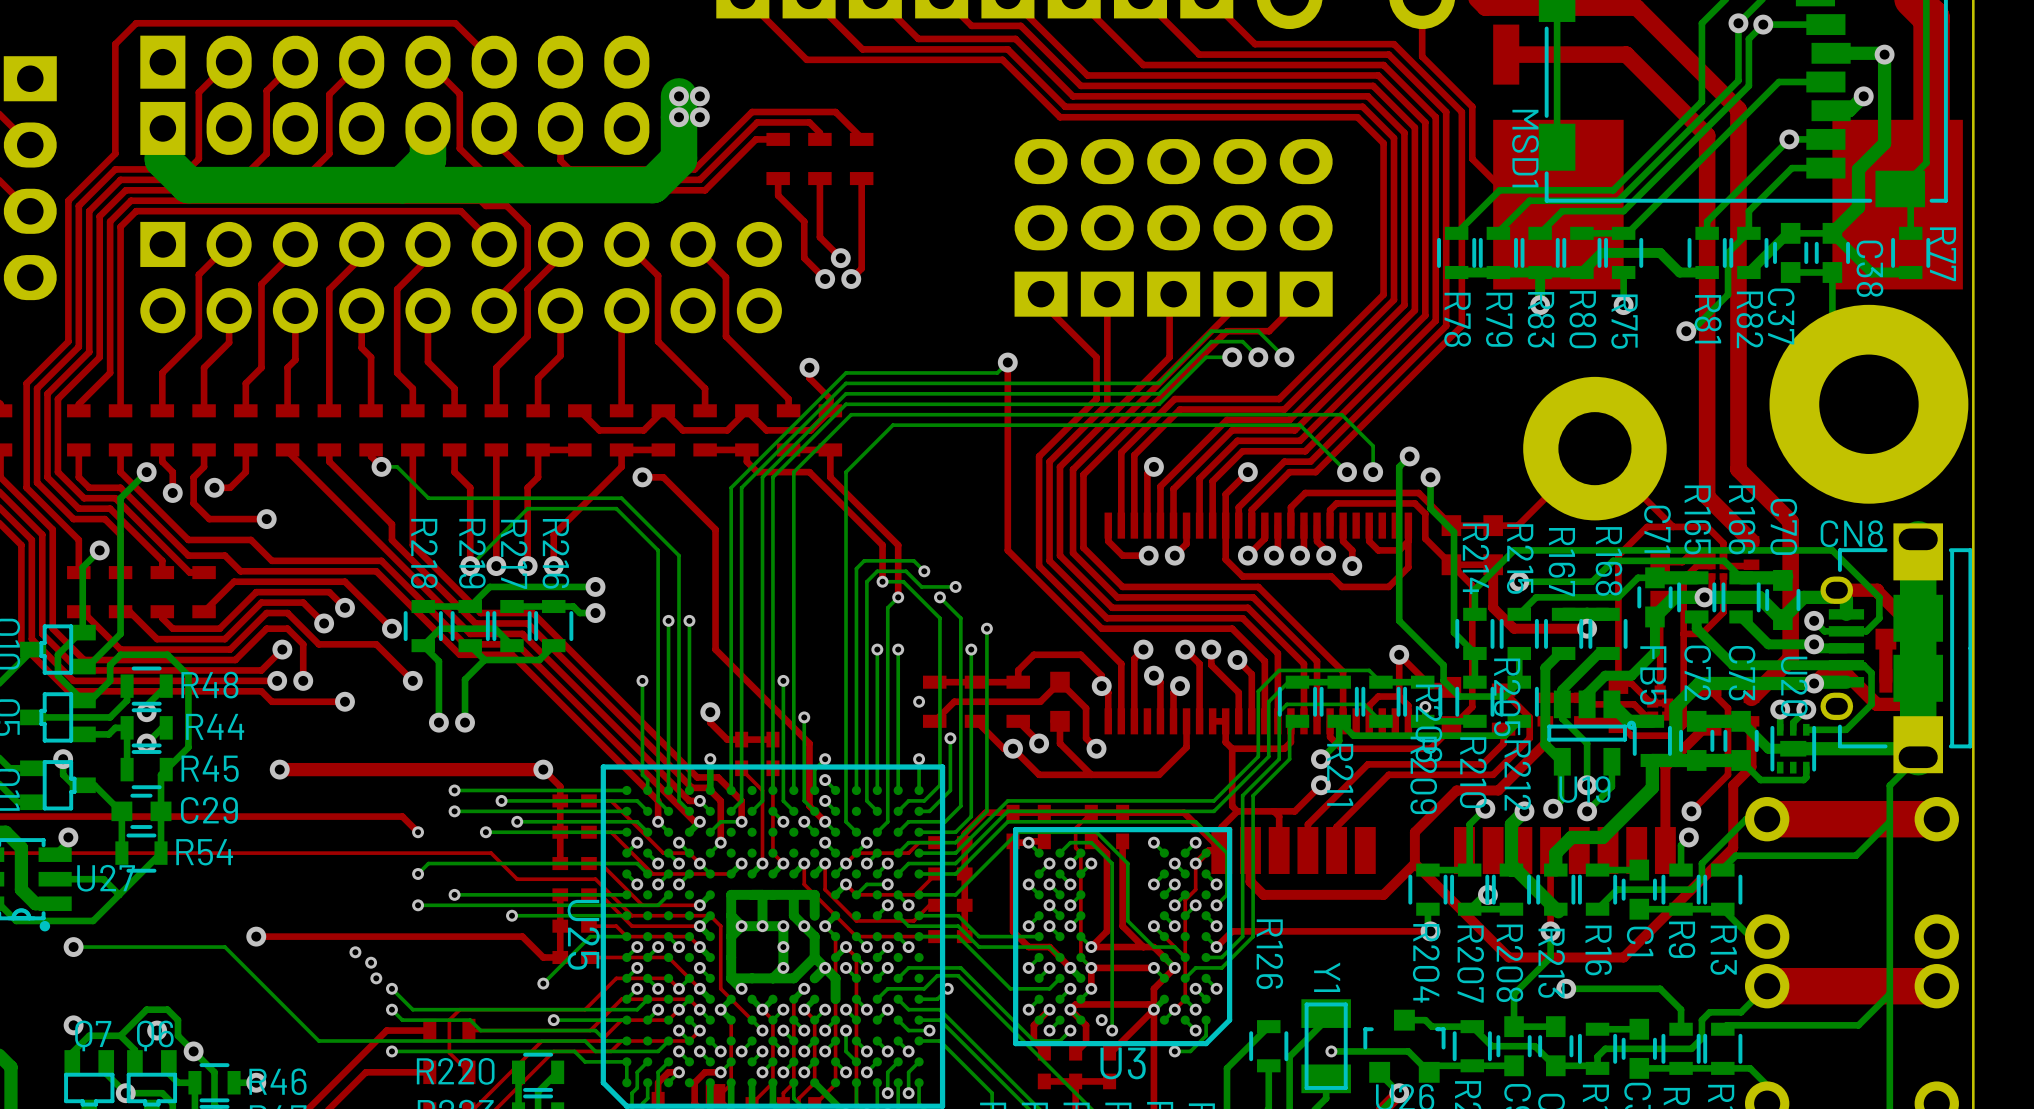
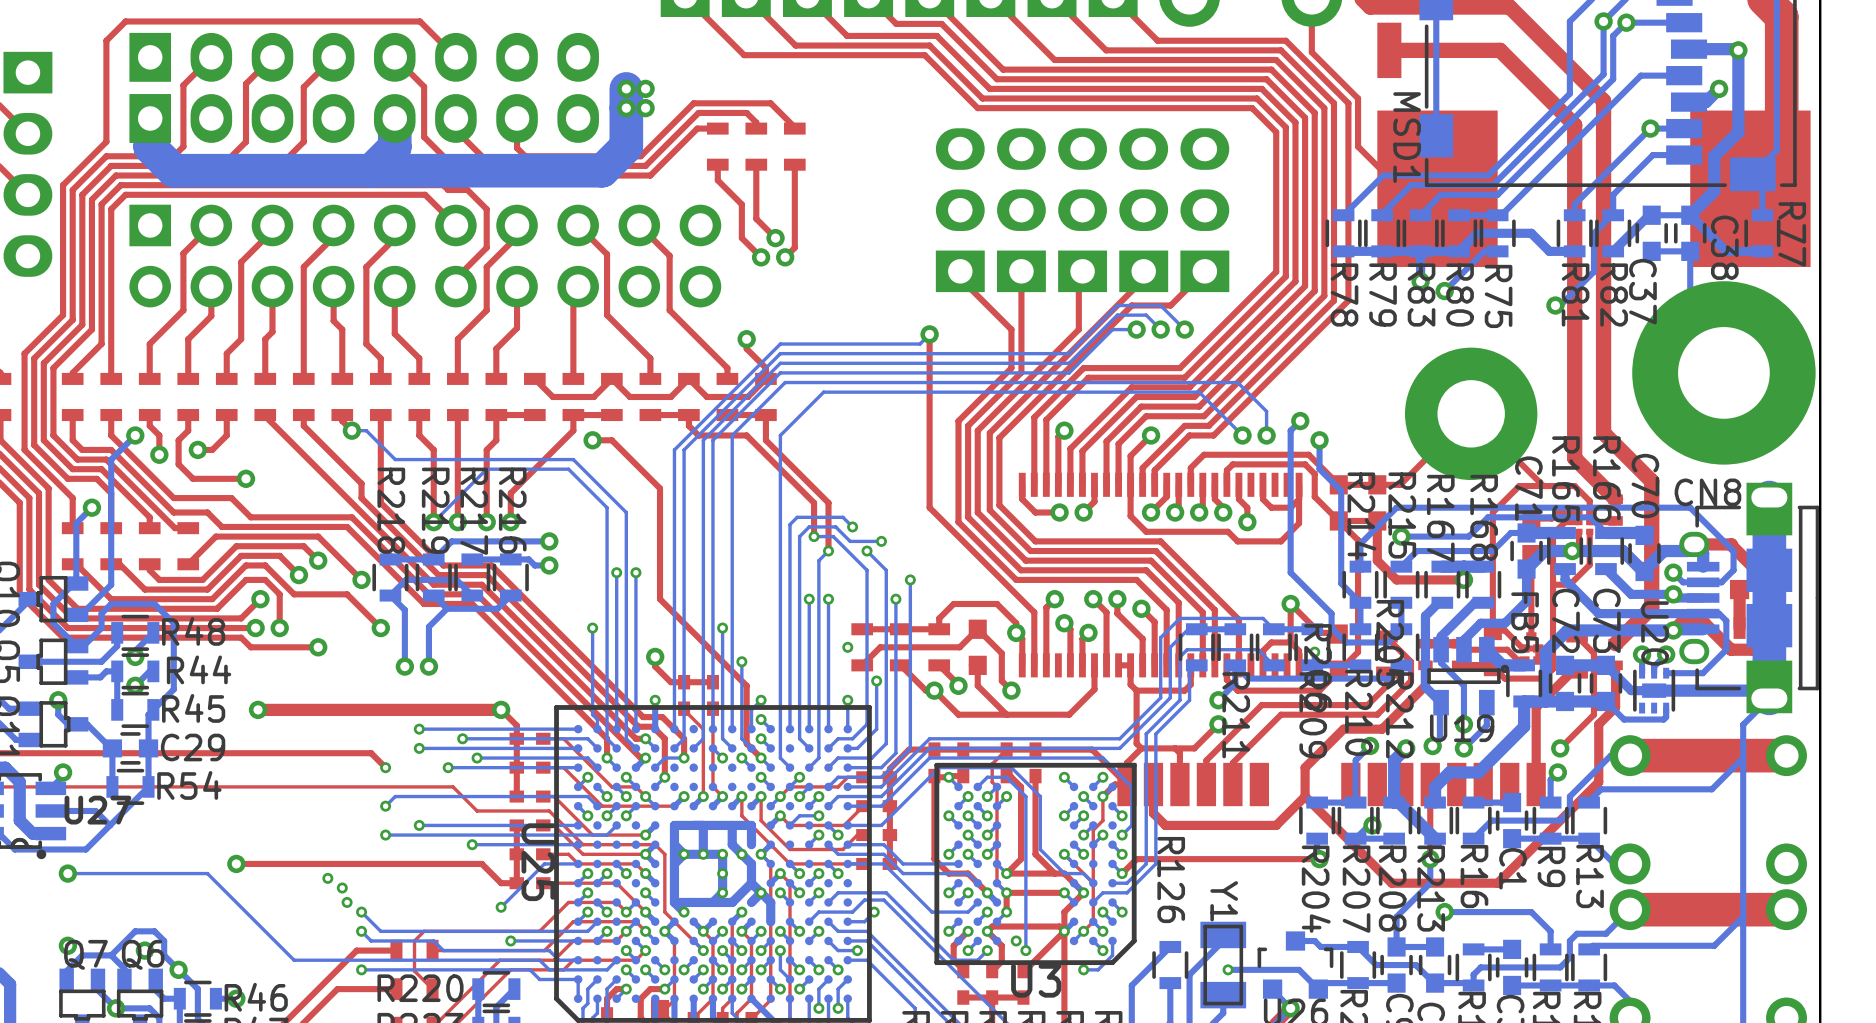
bottom track: (1623, 272) (1623, 305) -> (1497, 251) (1484, 251) (1444, 291)
via position: (1623, 305) -> (1444, 291)

